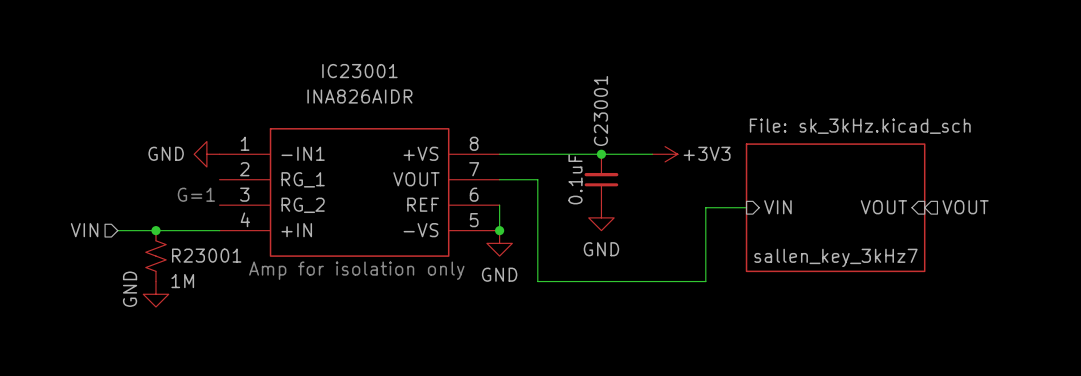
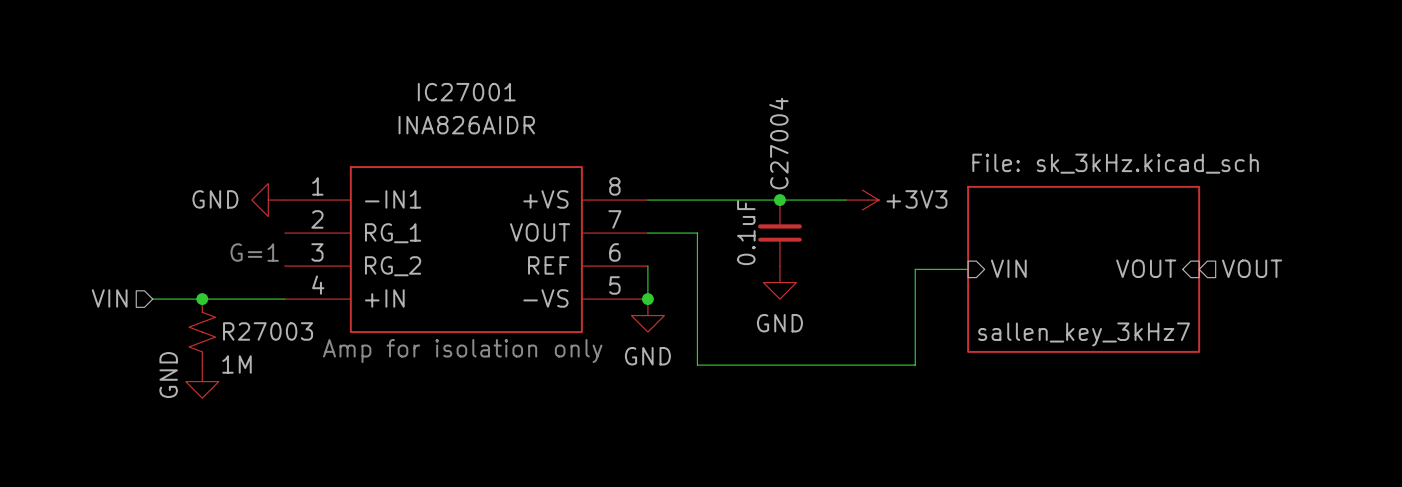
IC23001 name: IC23001 (359, 71) -> IC27001 (466, 92)
C23001 name: C23001 (600, 110) -> C27004 (778, 143)
R23001 name: R23001 (206, 255) -> R27003 (268, 331)

